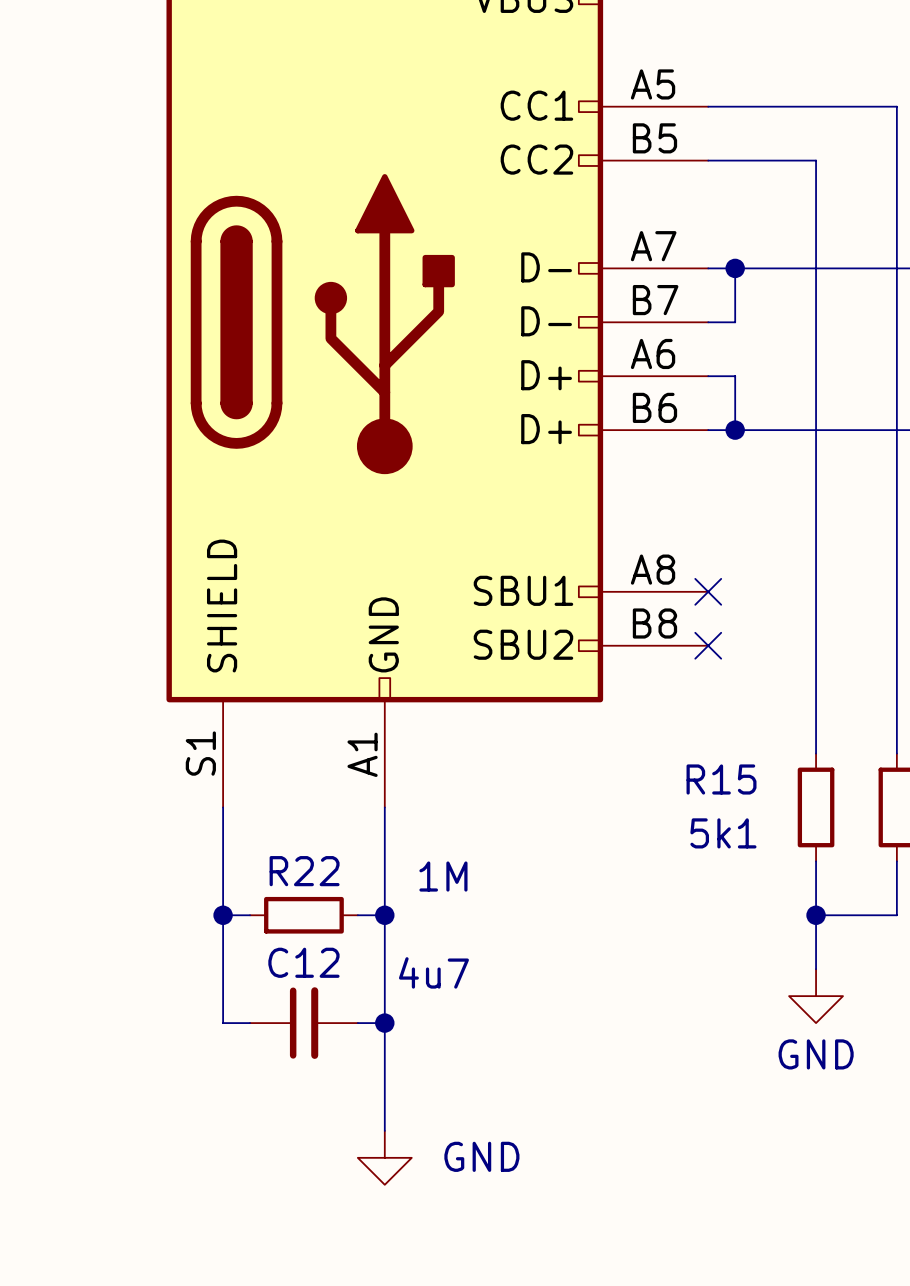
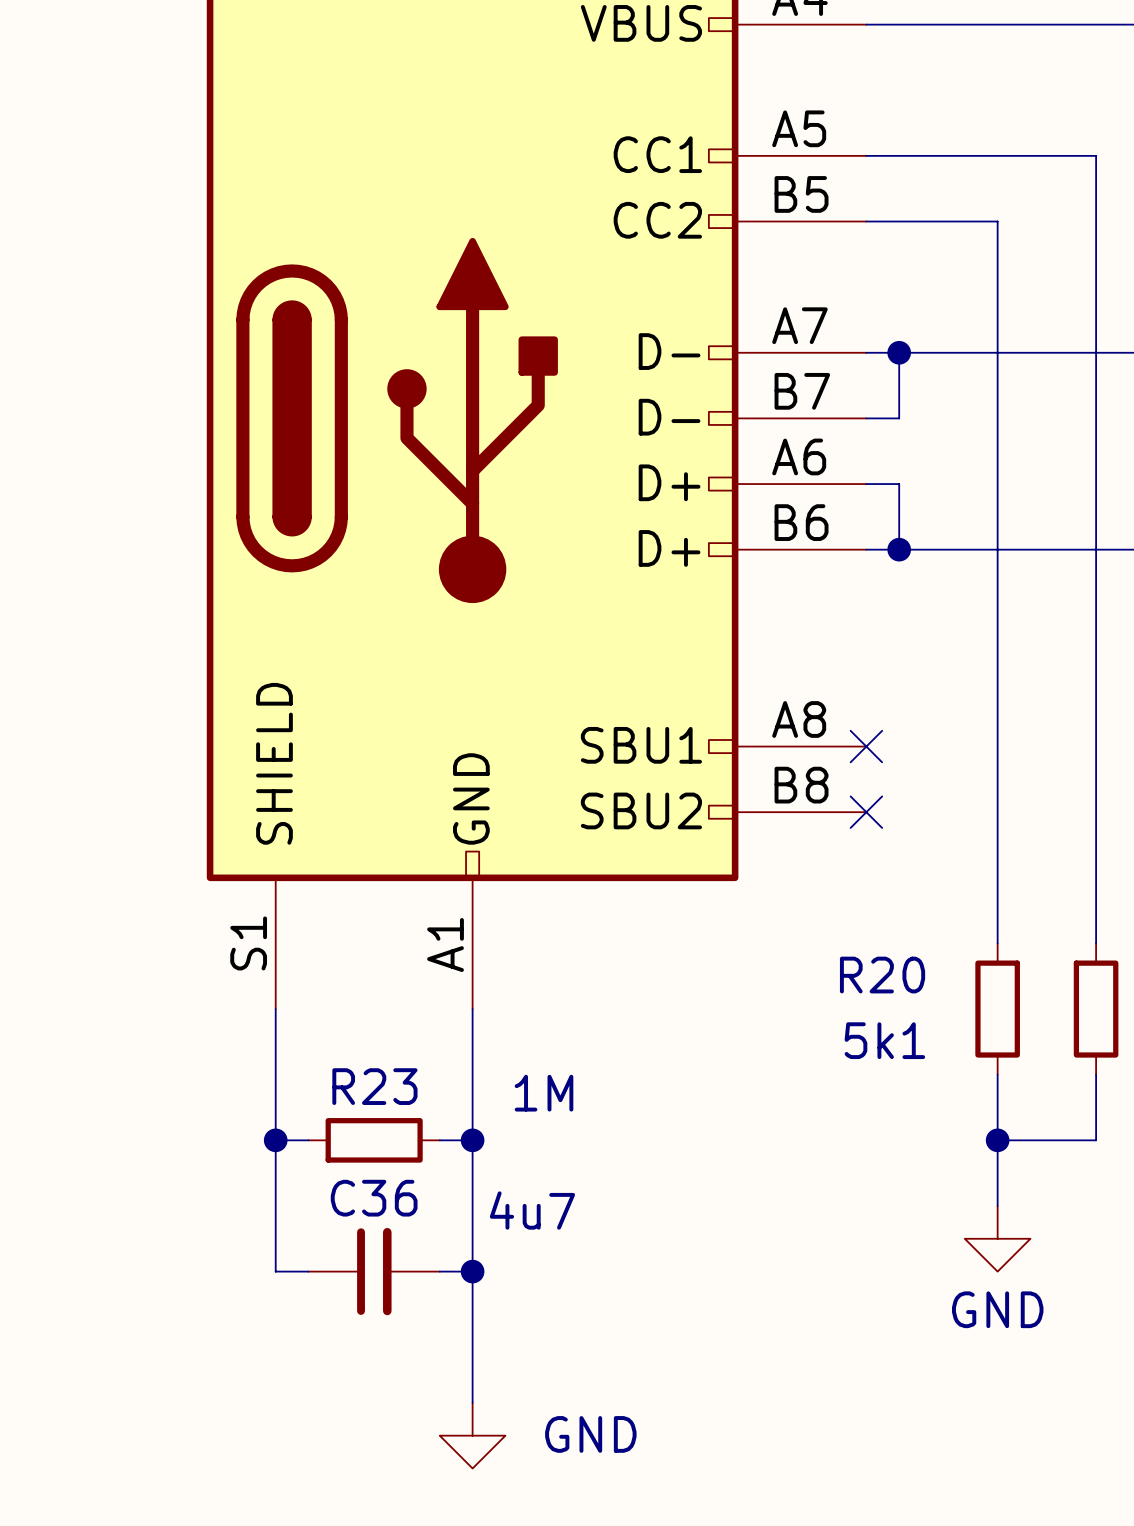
R15 name: R15 (721, 779) -> R20 (882, 975)
R22 name: R22 (304, 871) -> R23 (374, 1086)
C12 name: C12 (303, 962) -> C36 (374, 1198)

